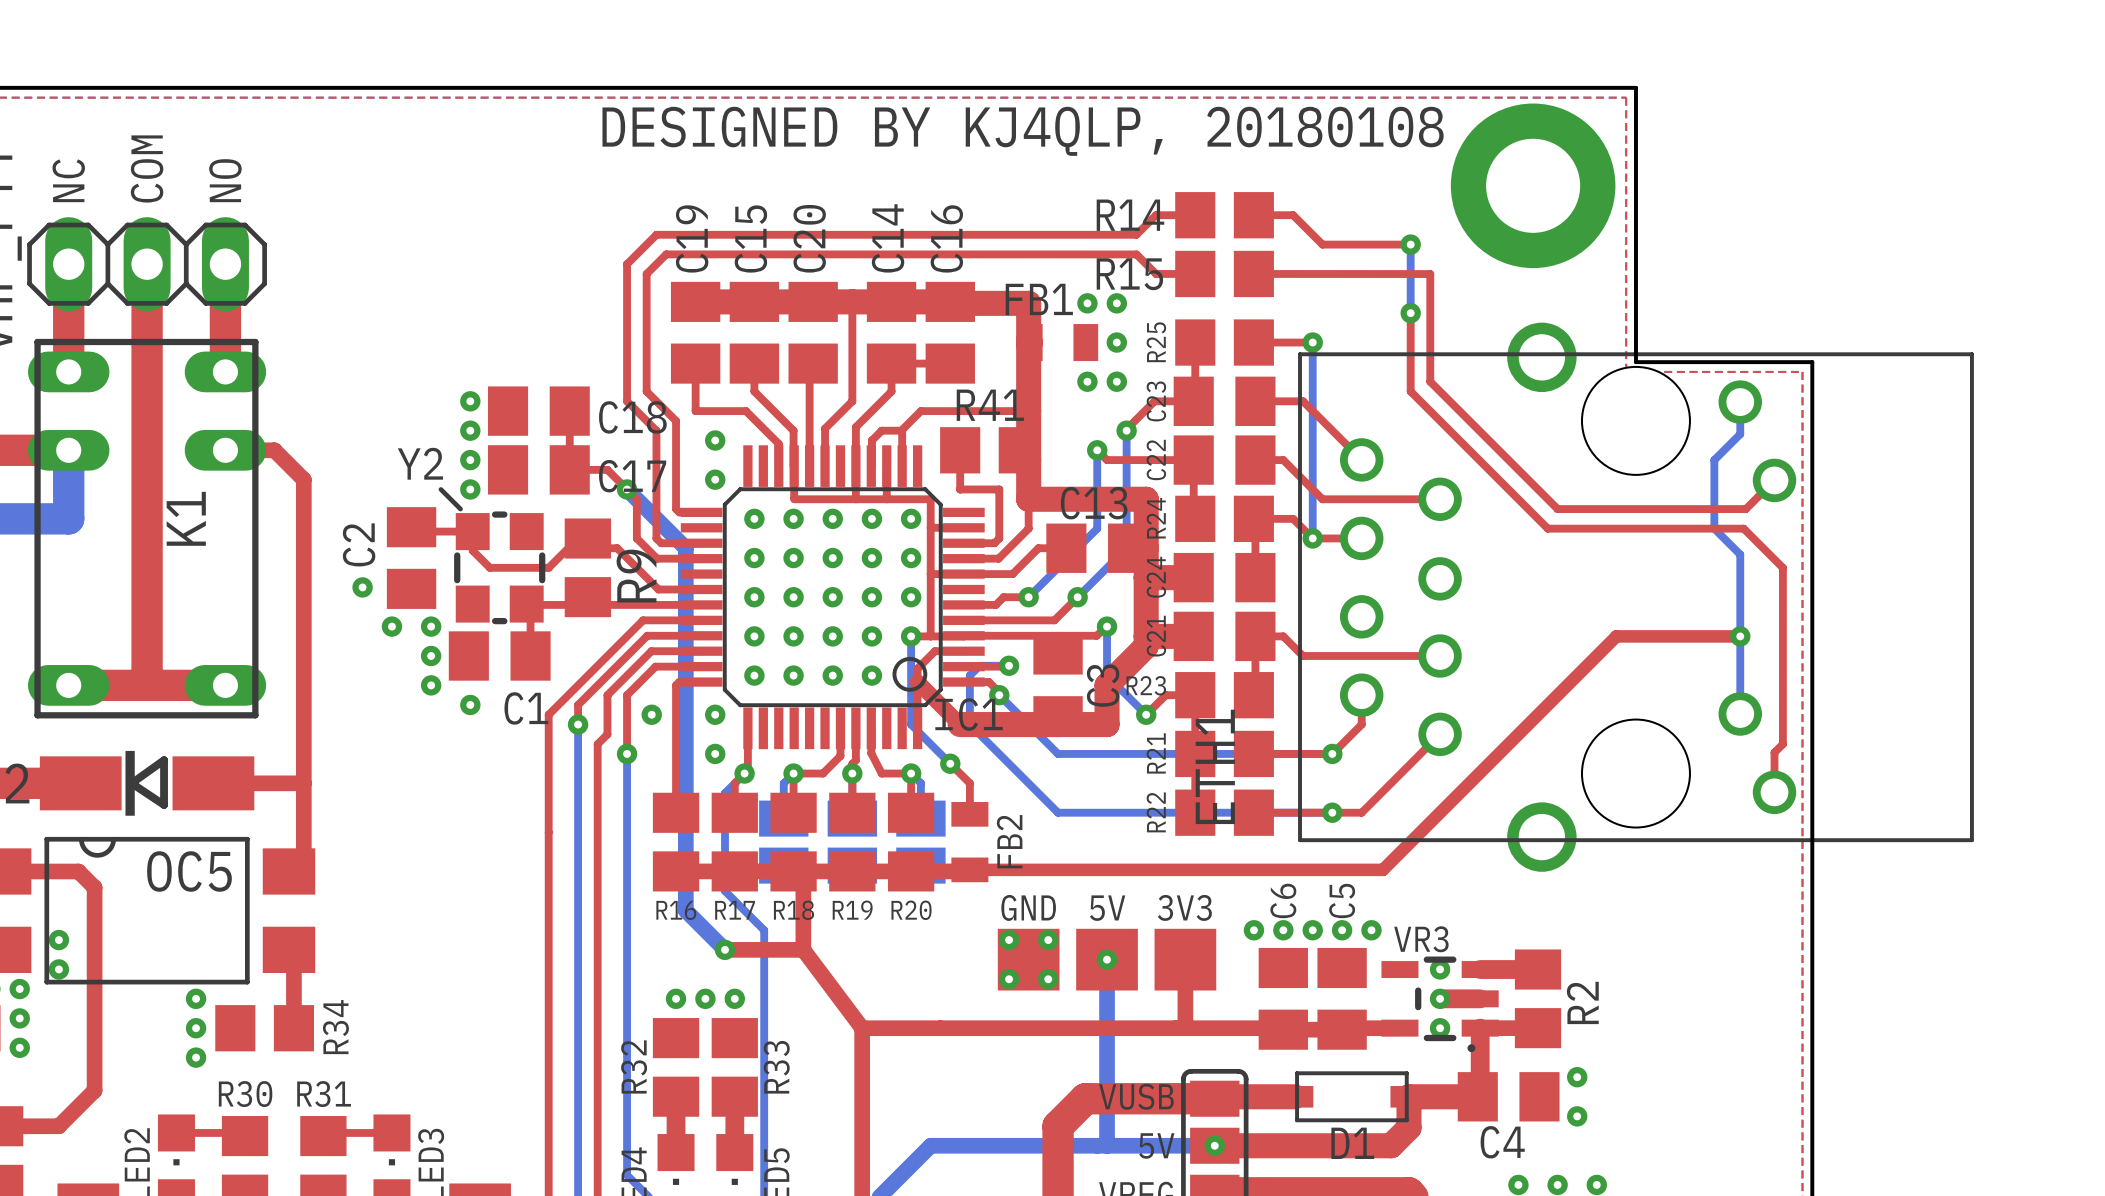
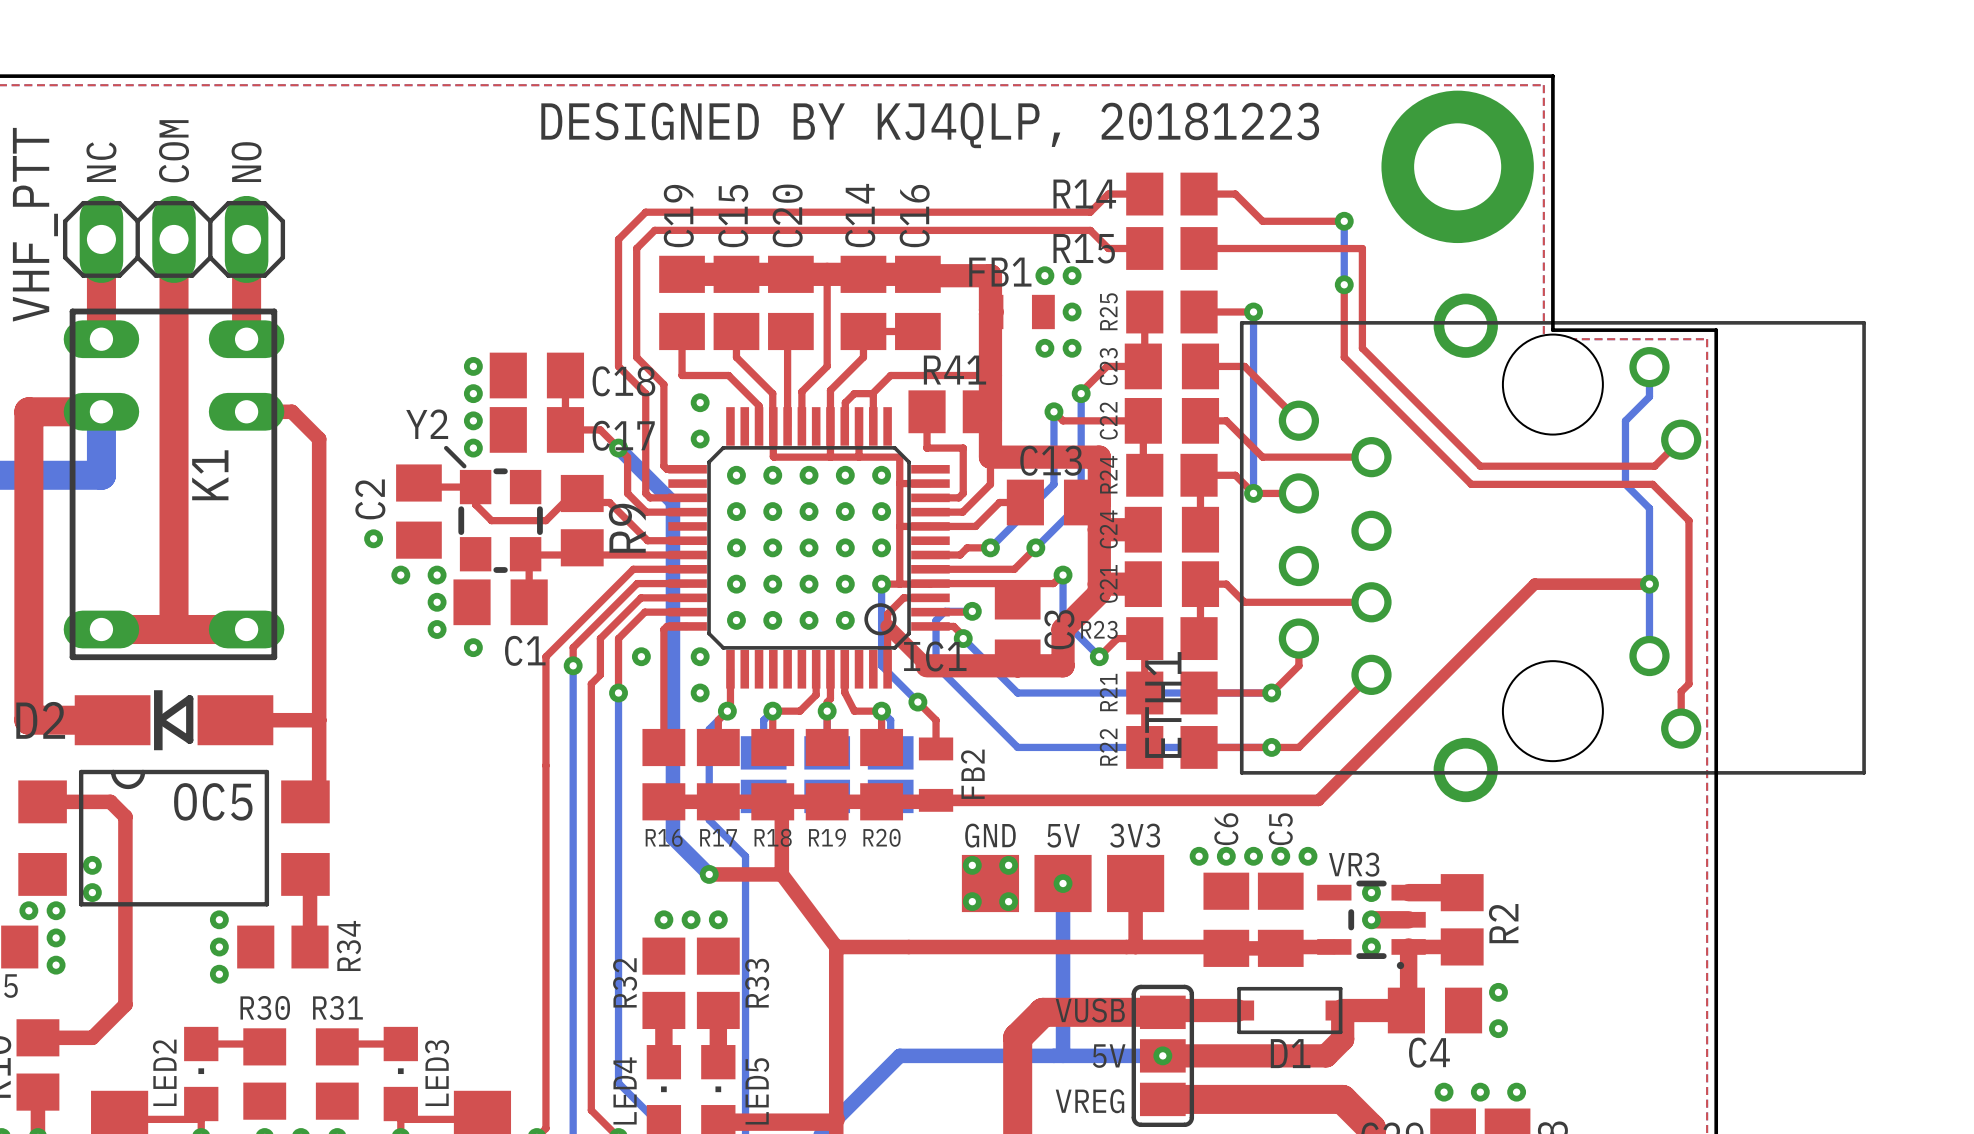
text: DESIGNED BY KJ4QLP, 20180108 (1023, 131) -> DESIGNED BY KJ4QLP, 20181223 (930, 125)

